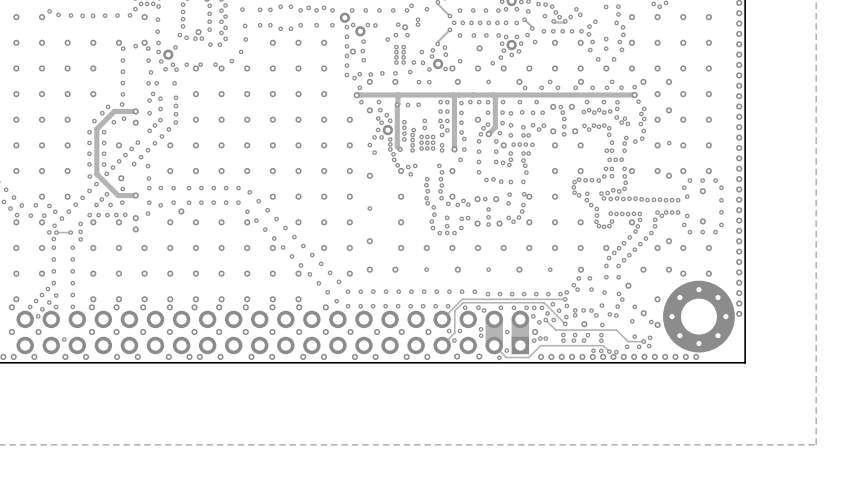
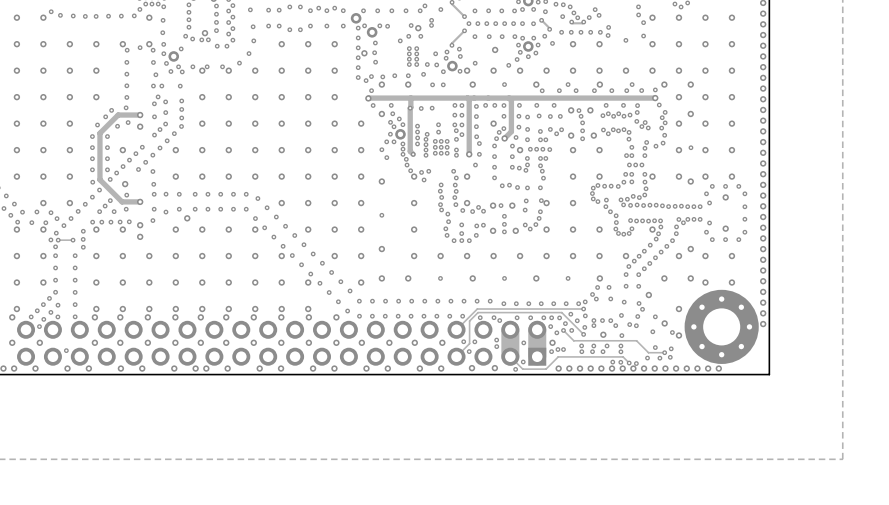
via: (606, 7) -> none
via: (595, 21) -> none
via: none -> (643, 22)
via: (616, 22) -> none
via: (623, 27) -> none
via: (592, 41) -> none
via: (619, 41) -> none
via: (606, 48) -> none
via: (622, 49) -> none
via: (590, 50) -> none
via: (598, 59) -> none
via: (614, 59) -> none

